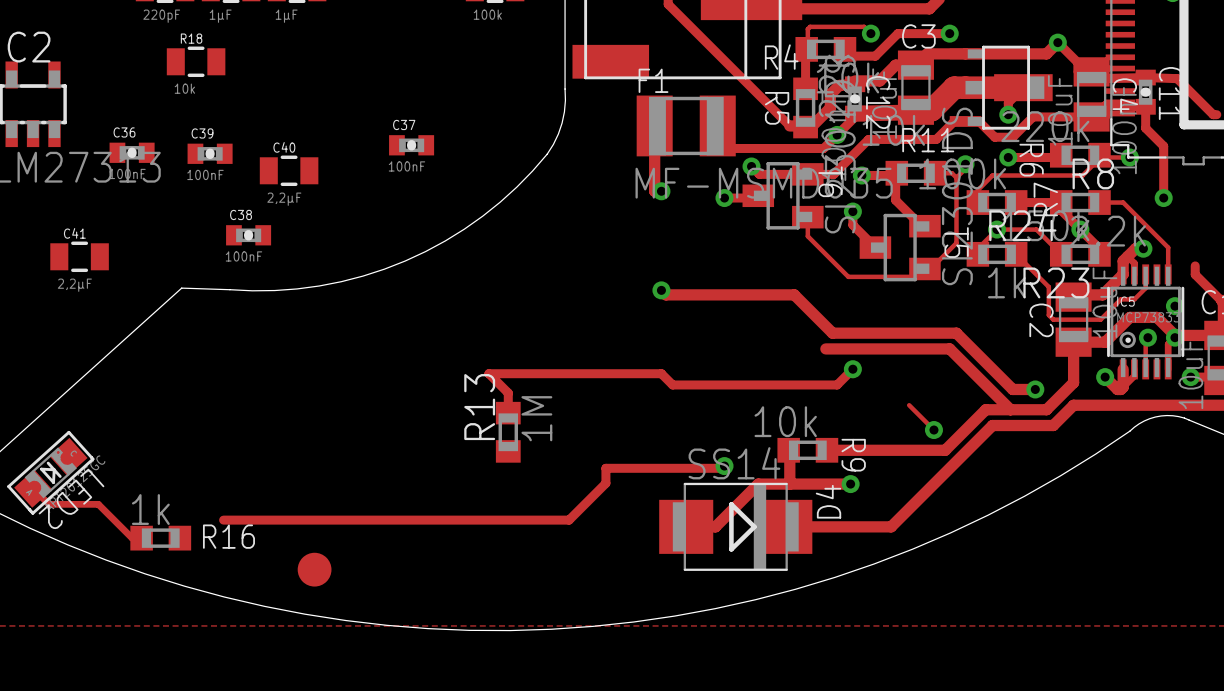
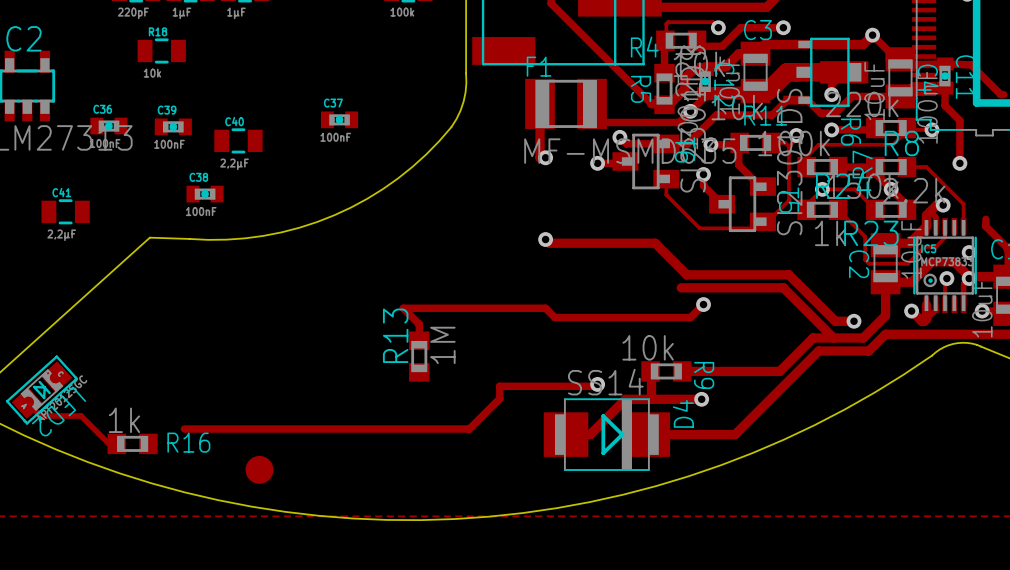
track: (909, 405) (933, 430) -> none
via: (933, 430) -> none

